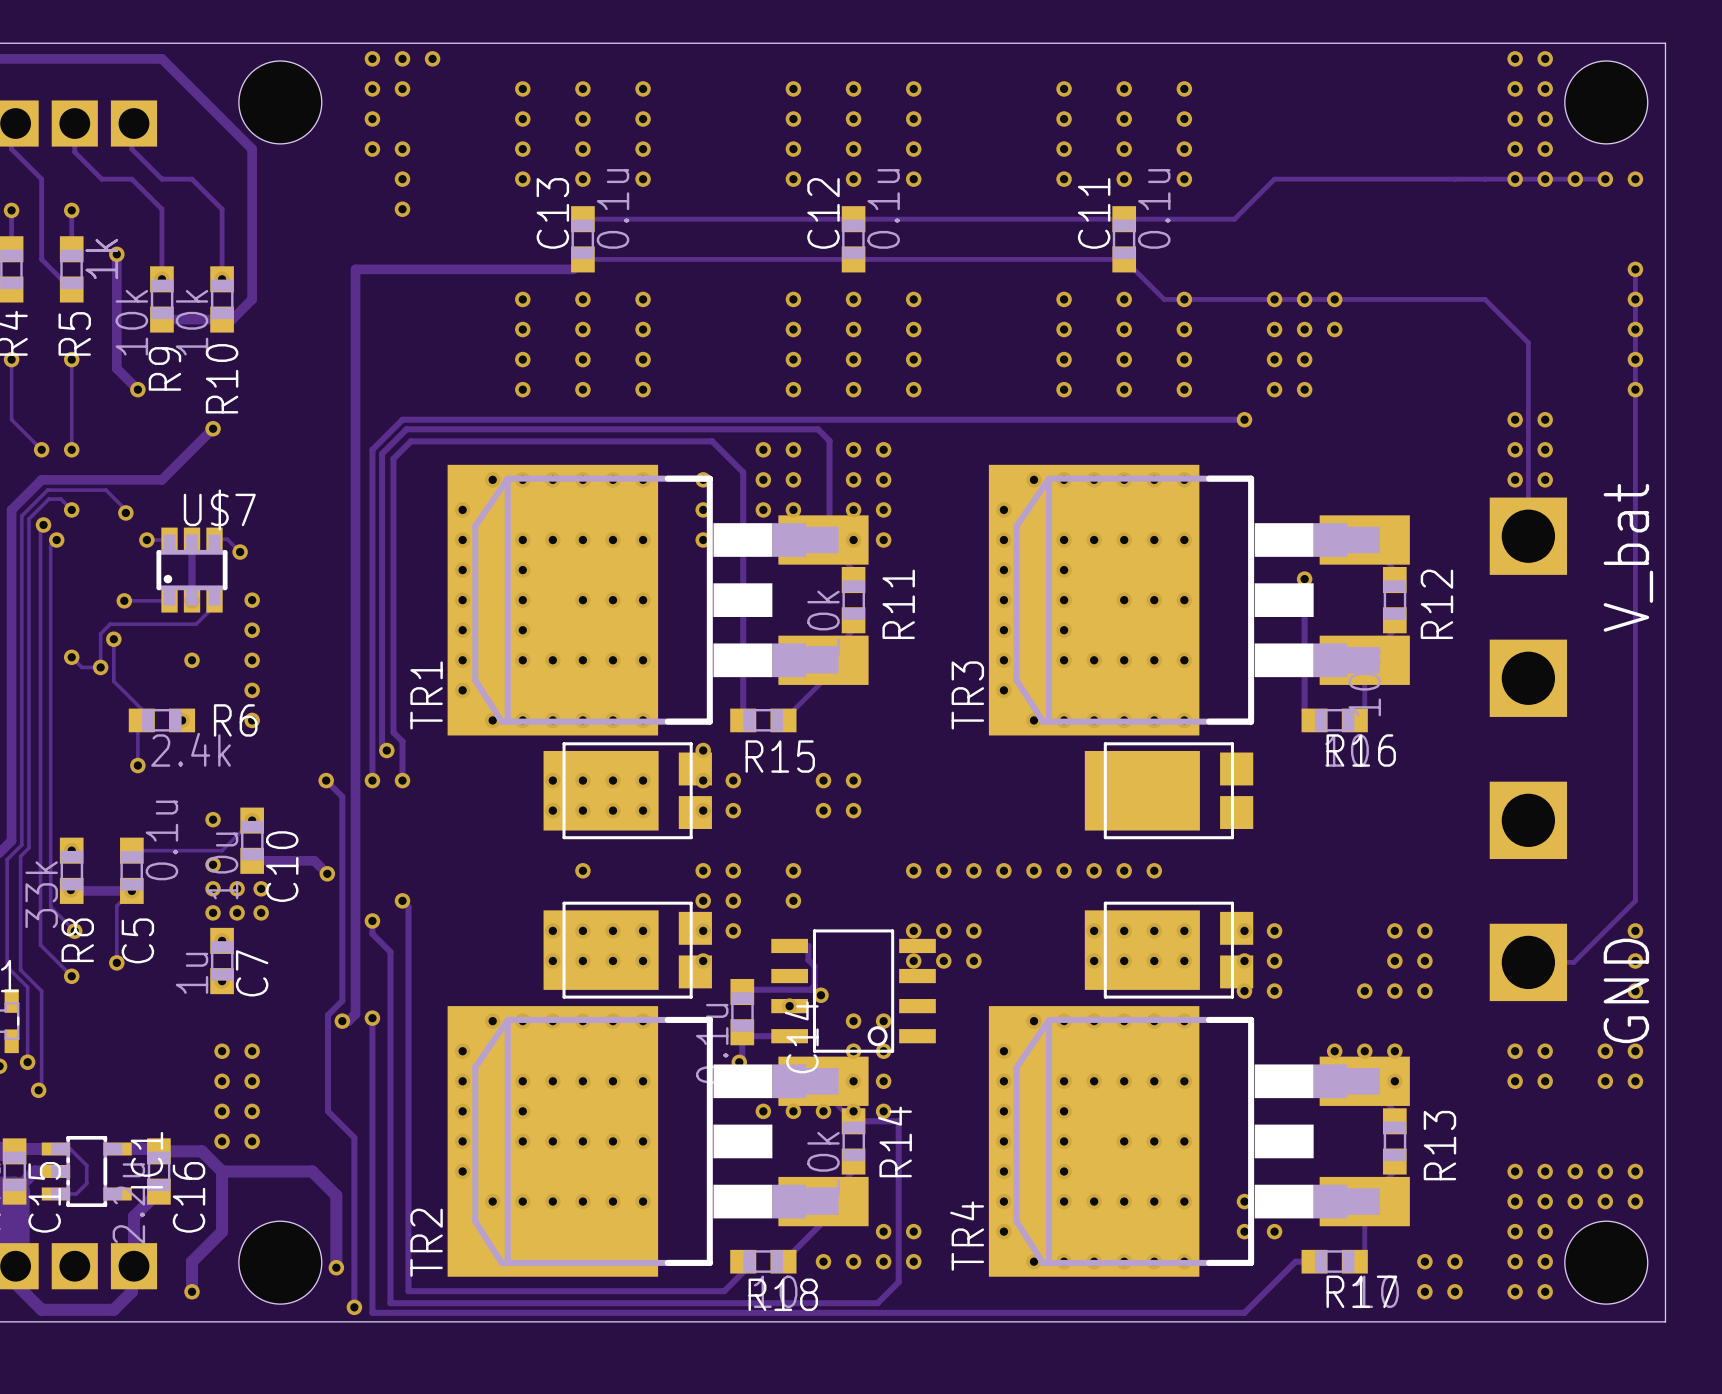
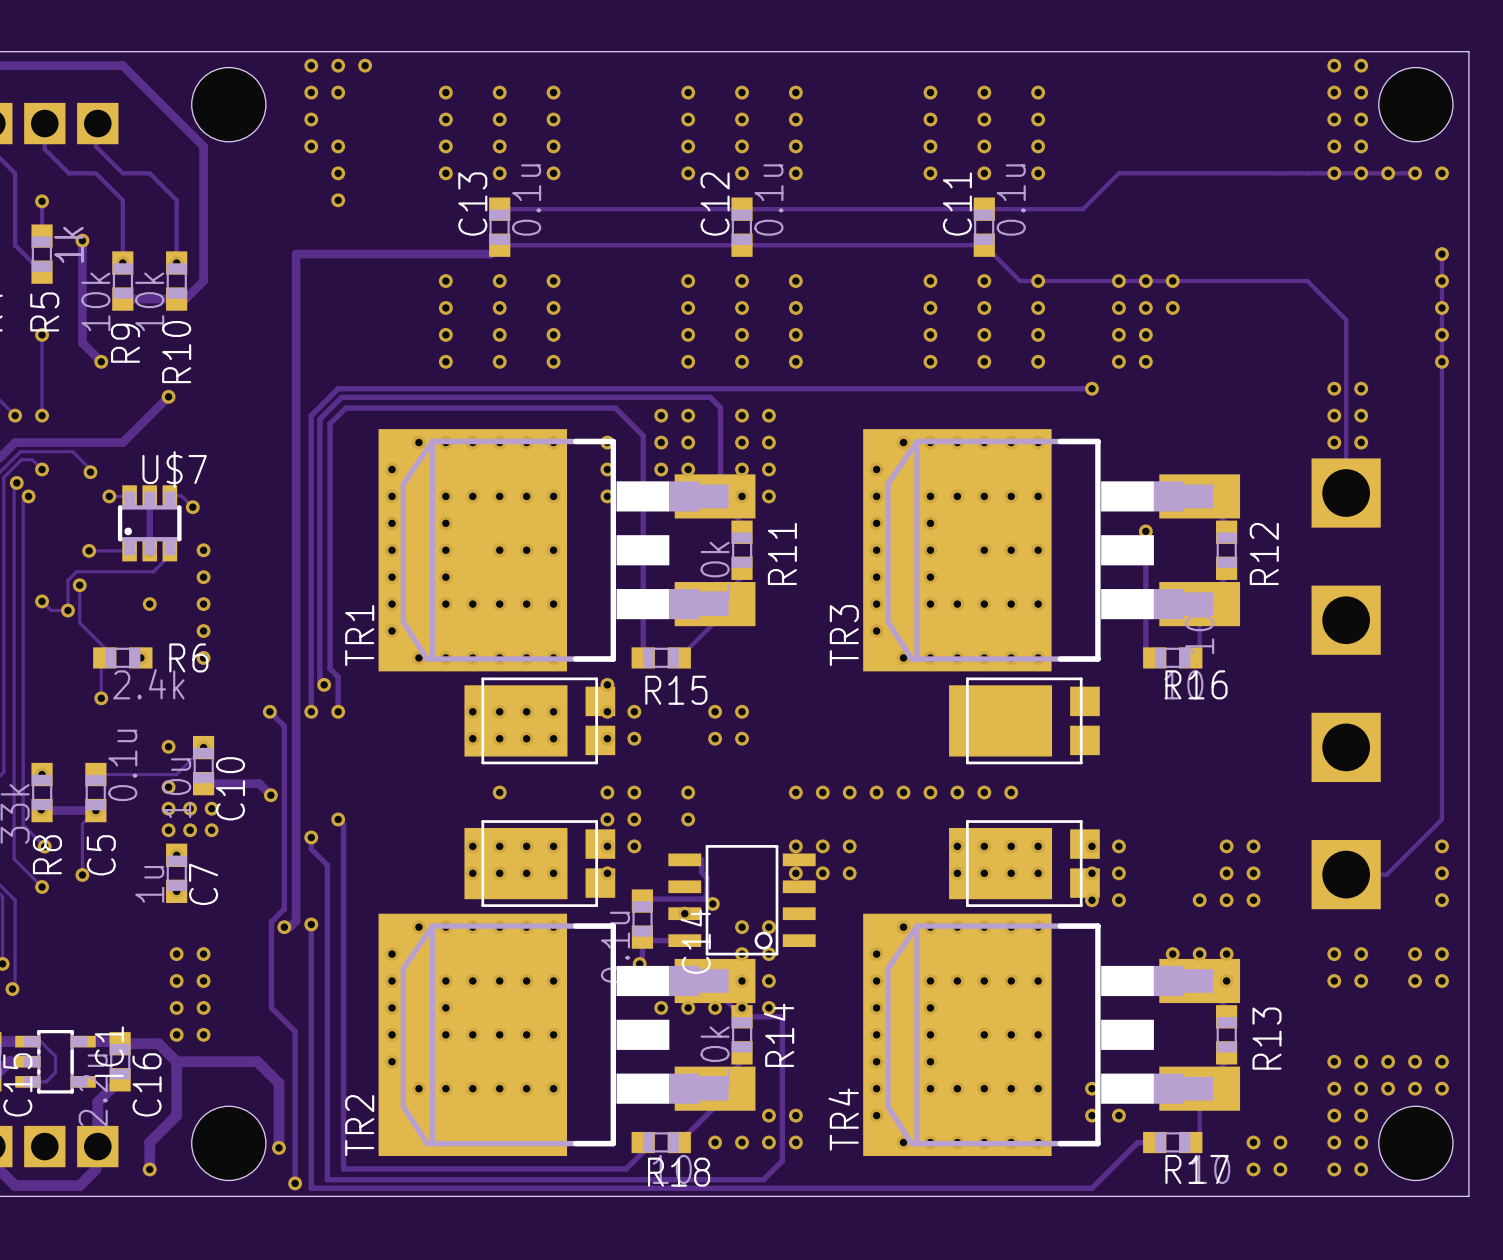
text: V_bat (1628, 557) -> none
text: GND (1626, 990) -> none

